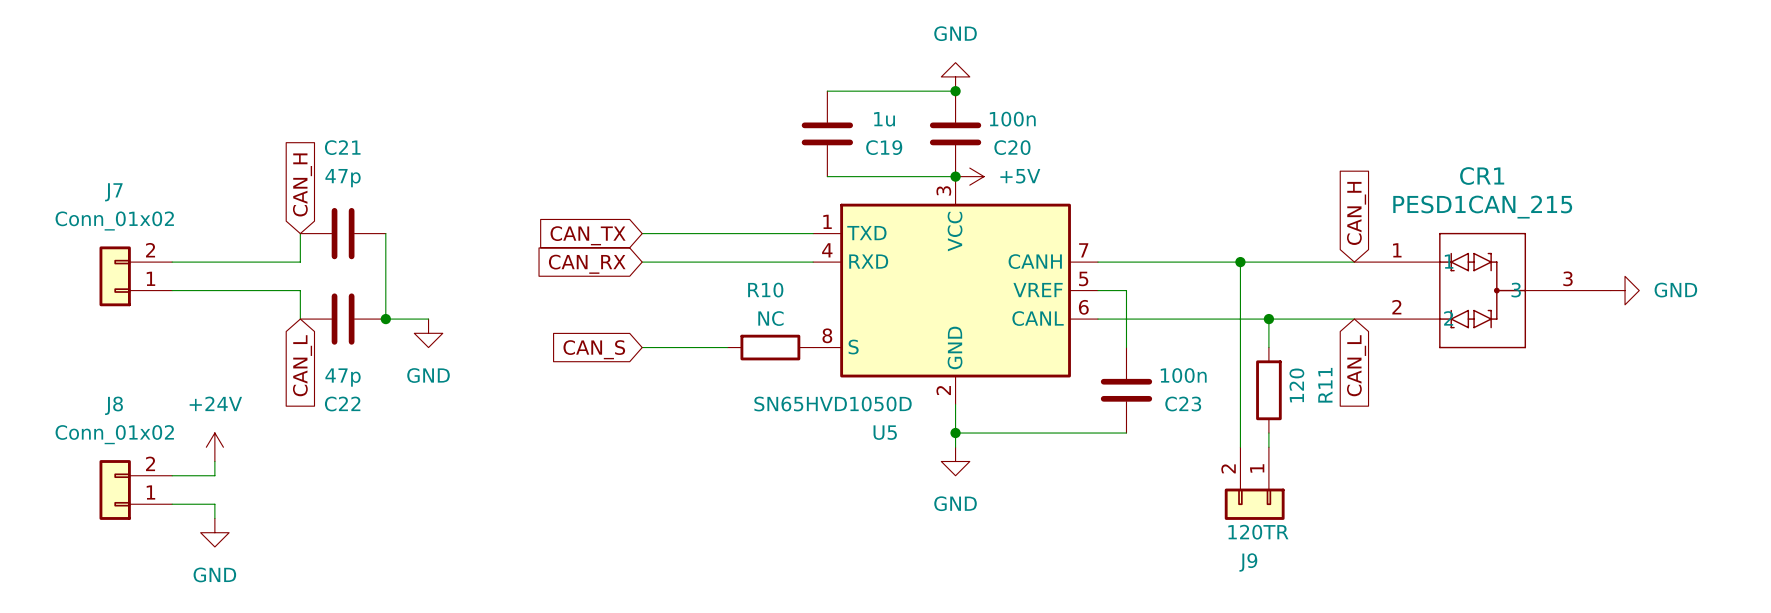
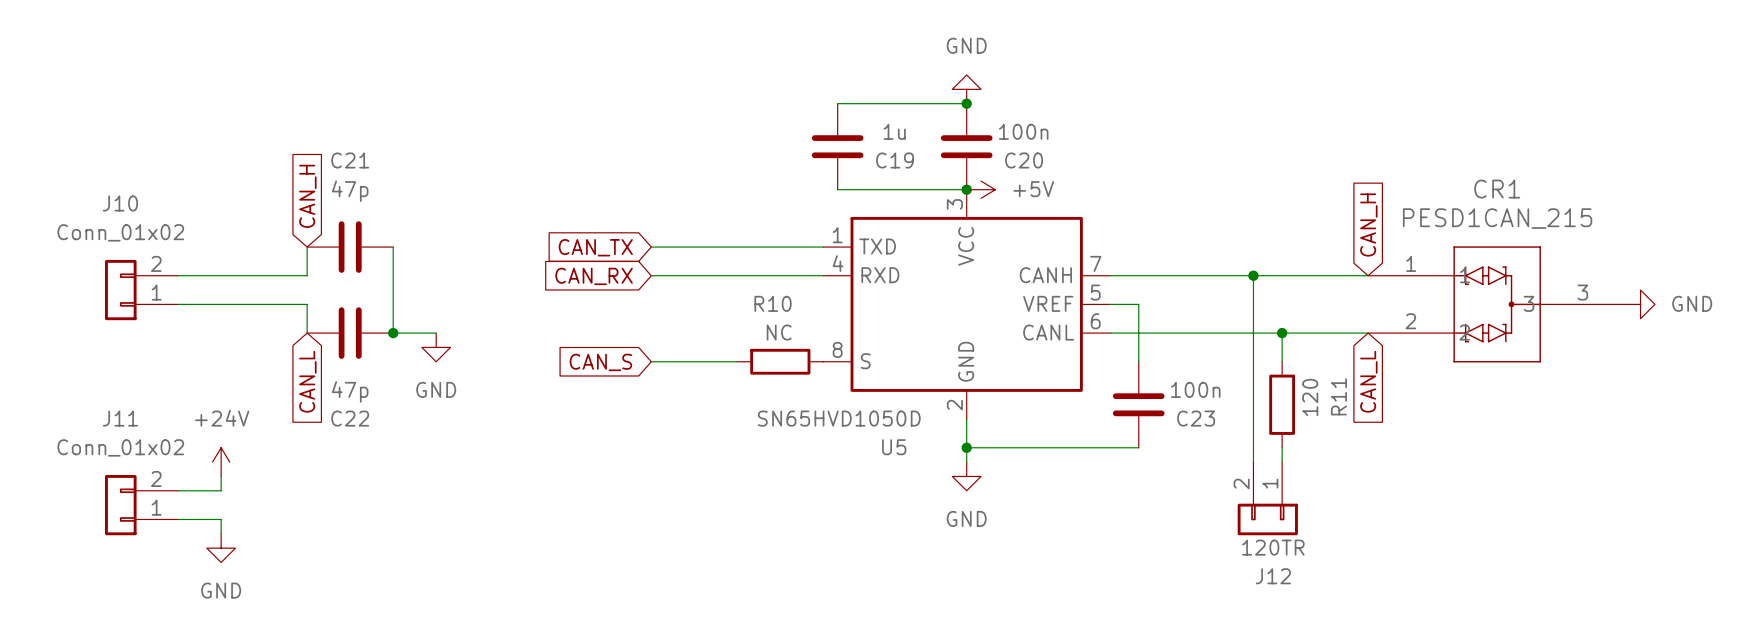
J7 name: J7 (113, 192) -> J10 (120, 203)
J8 name: J8 (114, 405) -> J11 (120, 418)
J9 name: J9 (1248, 562) -> J12 (1273, 576)

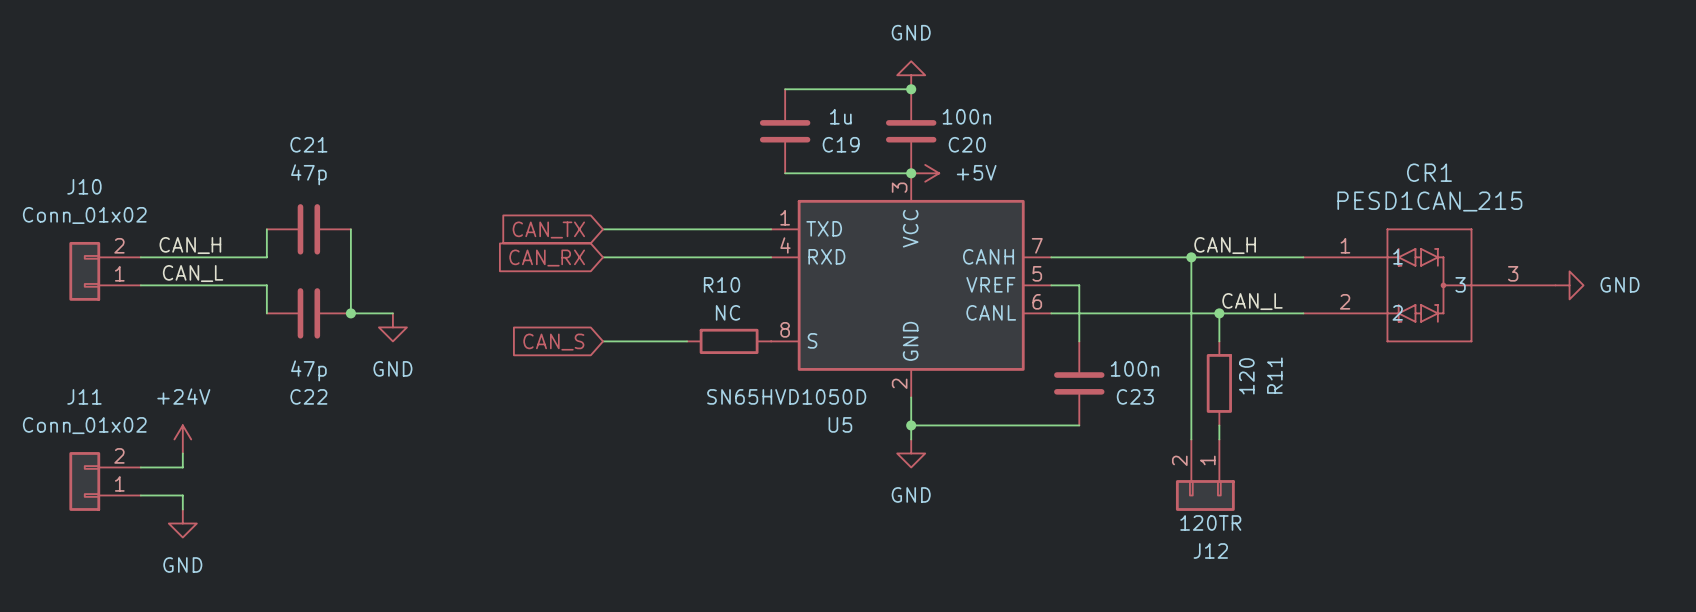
global label: CAN_H (307, 196) -> none
global label: CAN_H (1368, 225) -> none
label: none -> CAN_H (190, 245)
label: none -> CAN_H (1225, 245)
label: none -> CAN_L (193, 273)
label: none -> CAN_L (1252, 301)
global label: CAN_L (307, 381) -> none
global label: CAN_L (1368, 381) -> none

